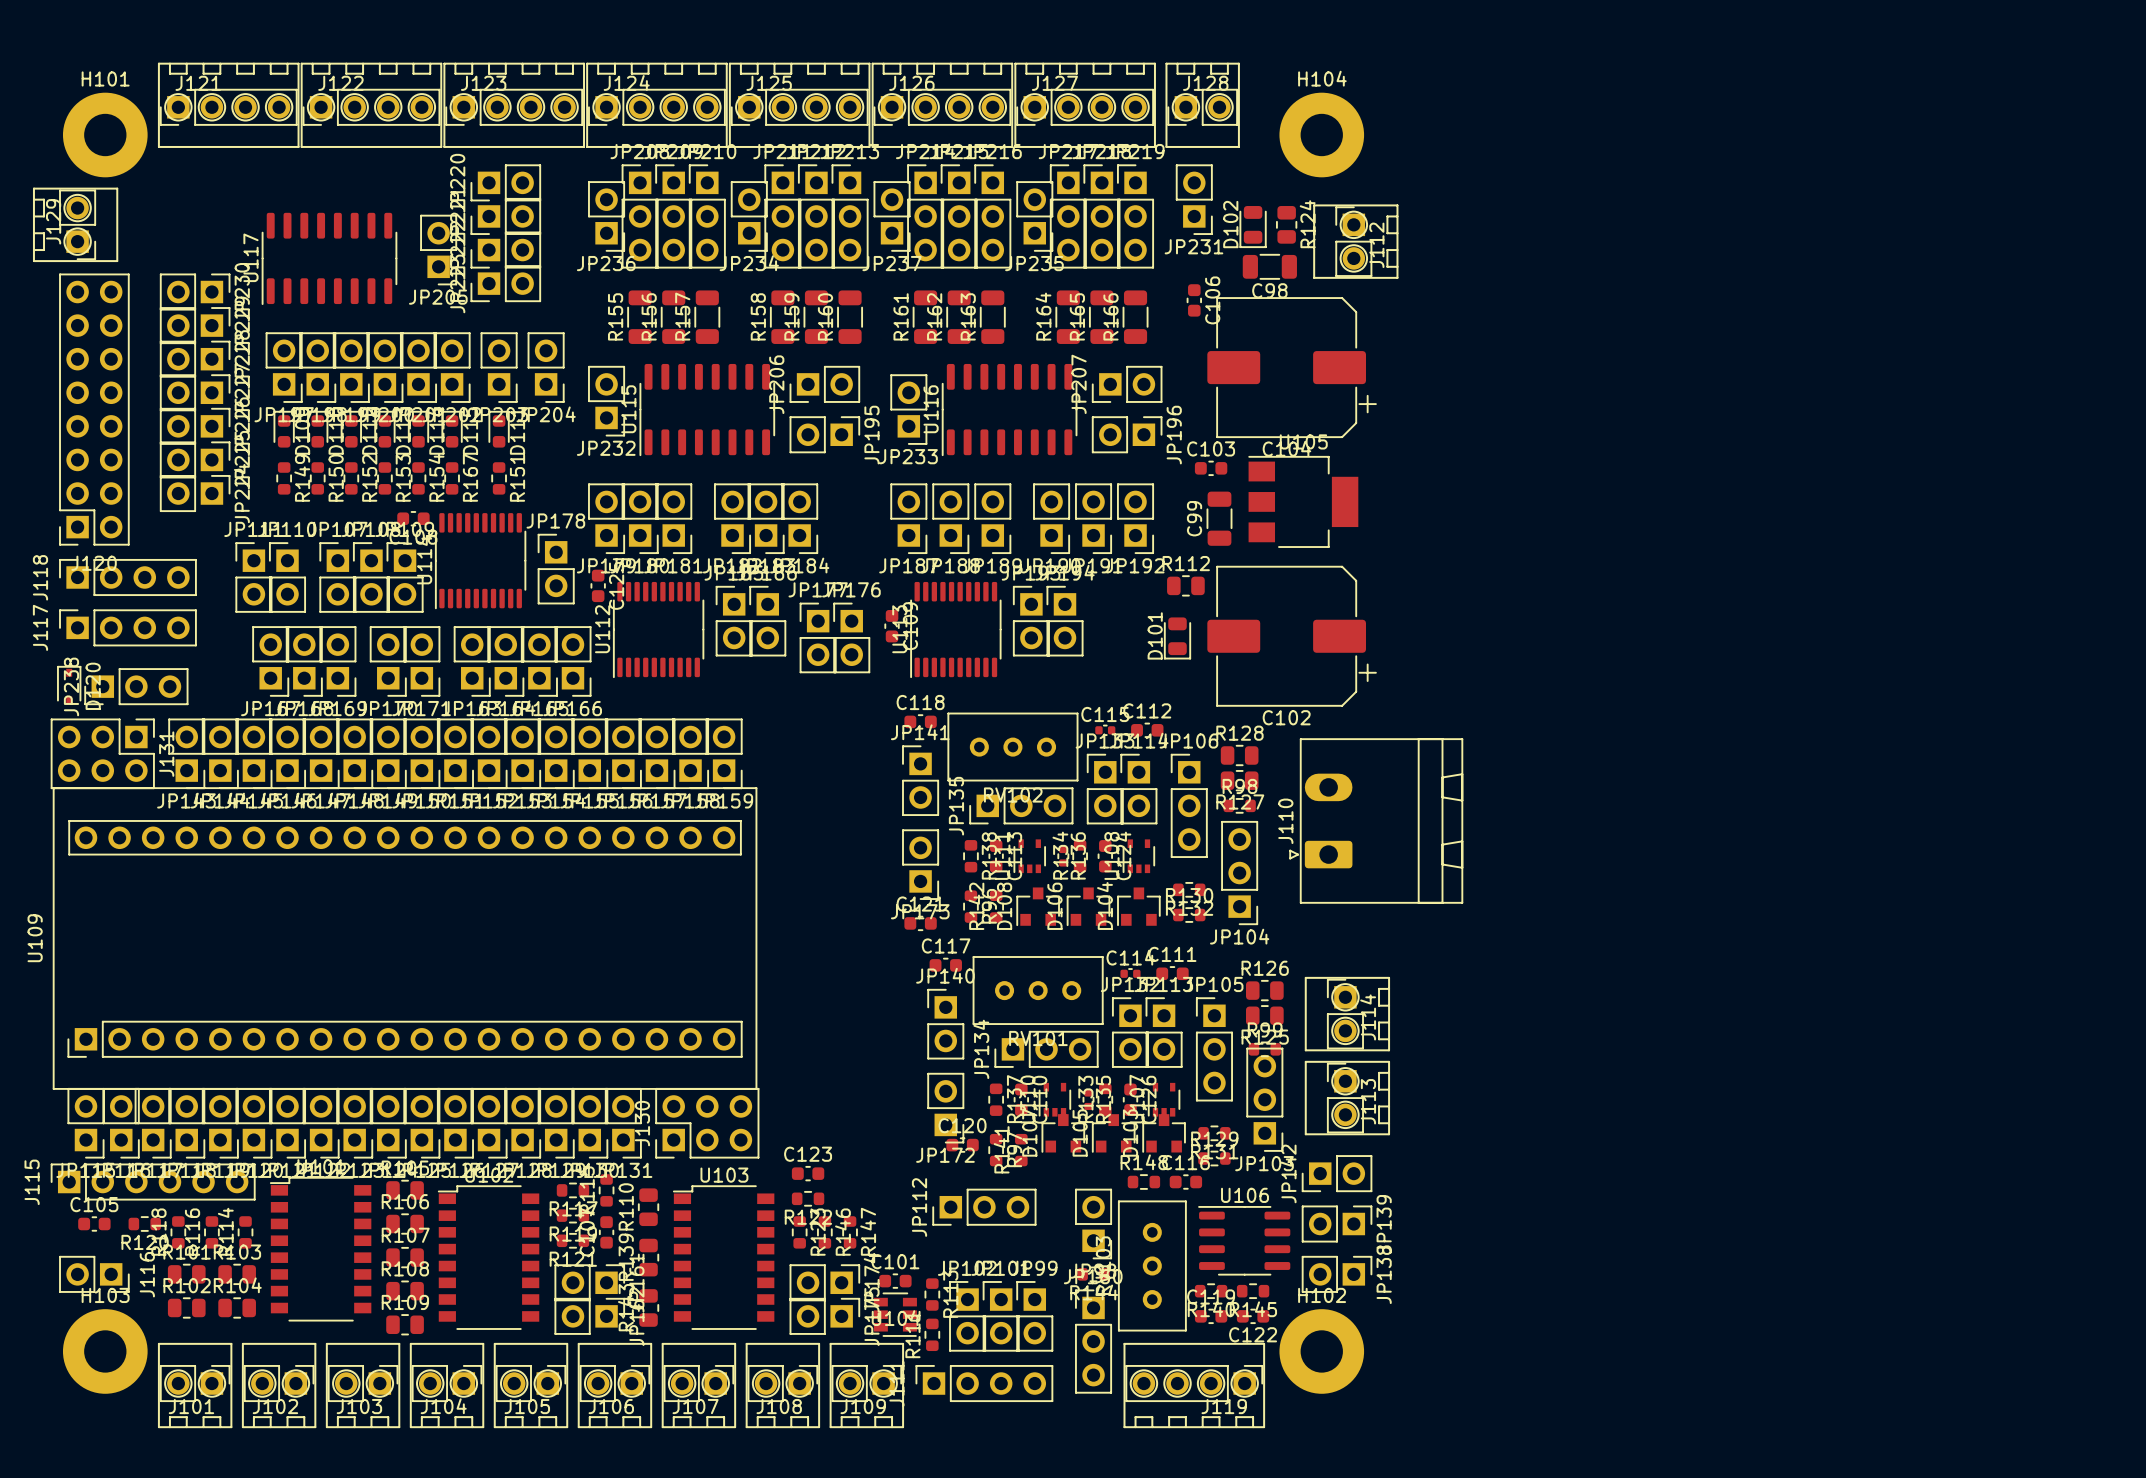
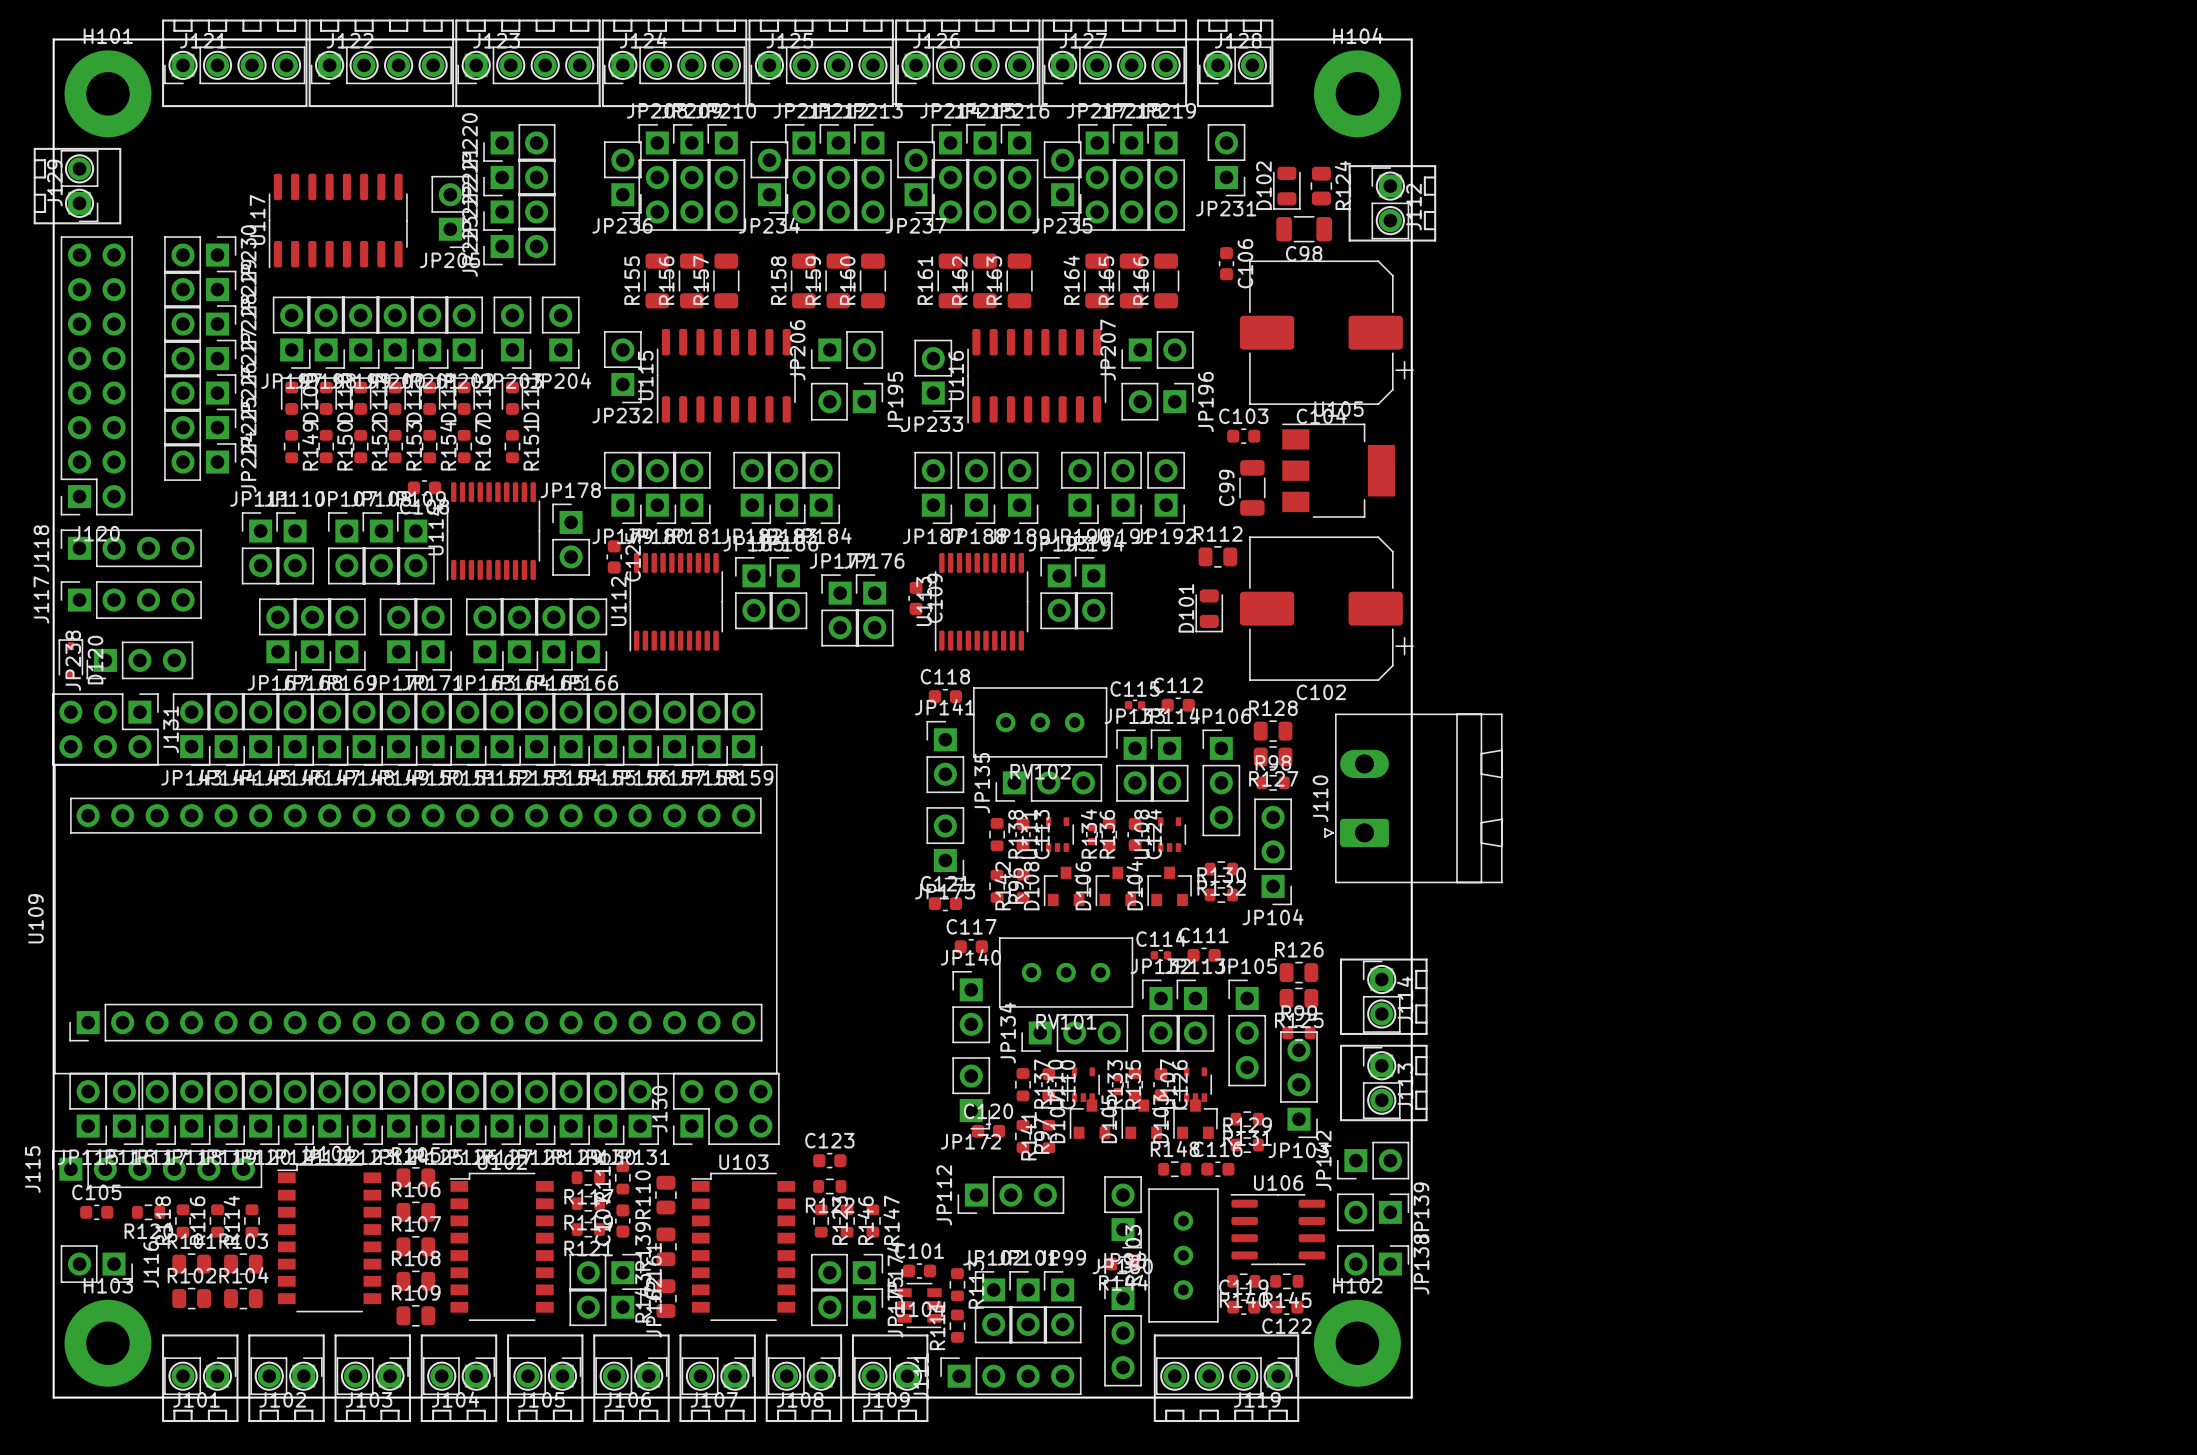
board edge: none -> (53, 39) (53, 1397) (1411, 1397) (1411, 39) (53, 39)

